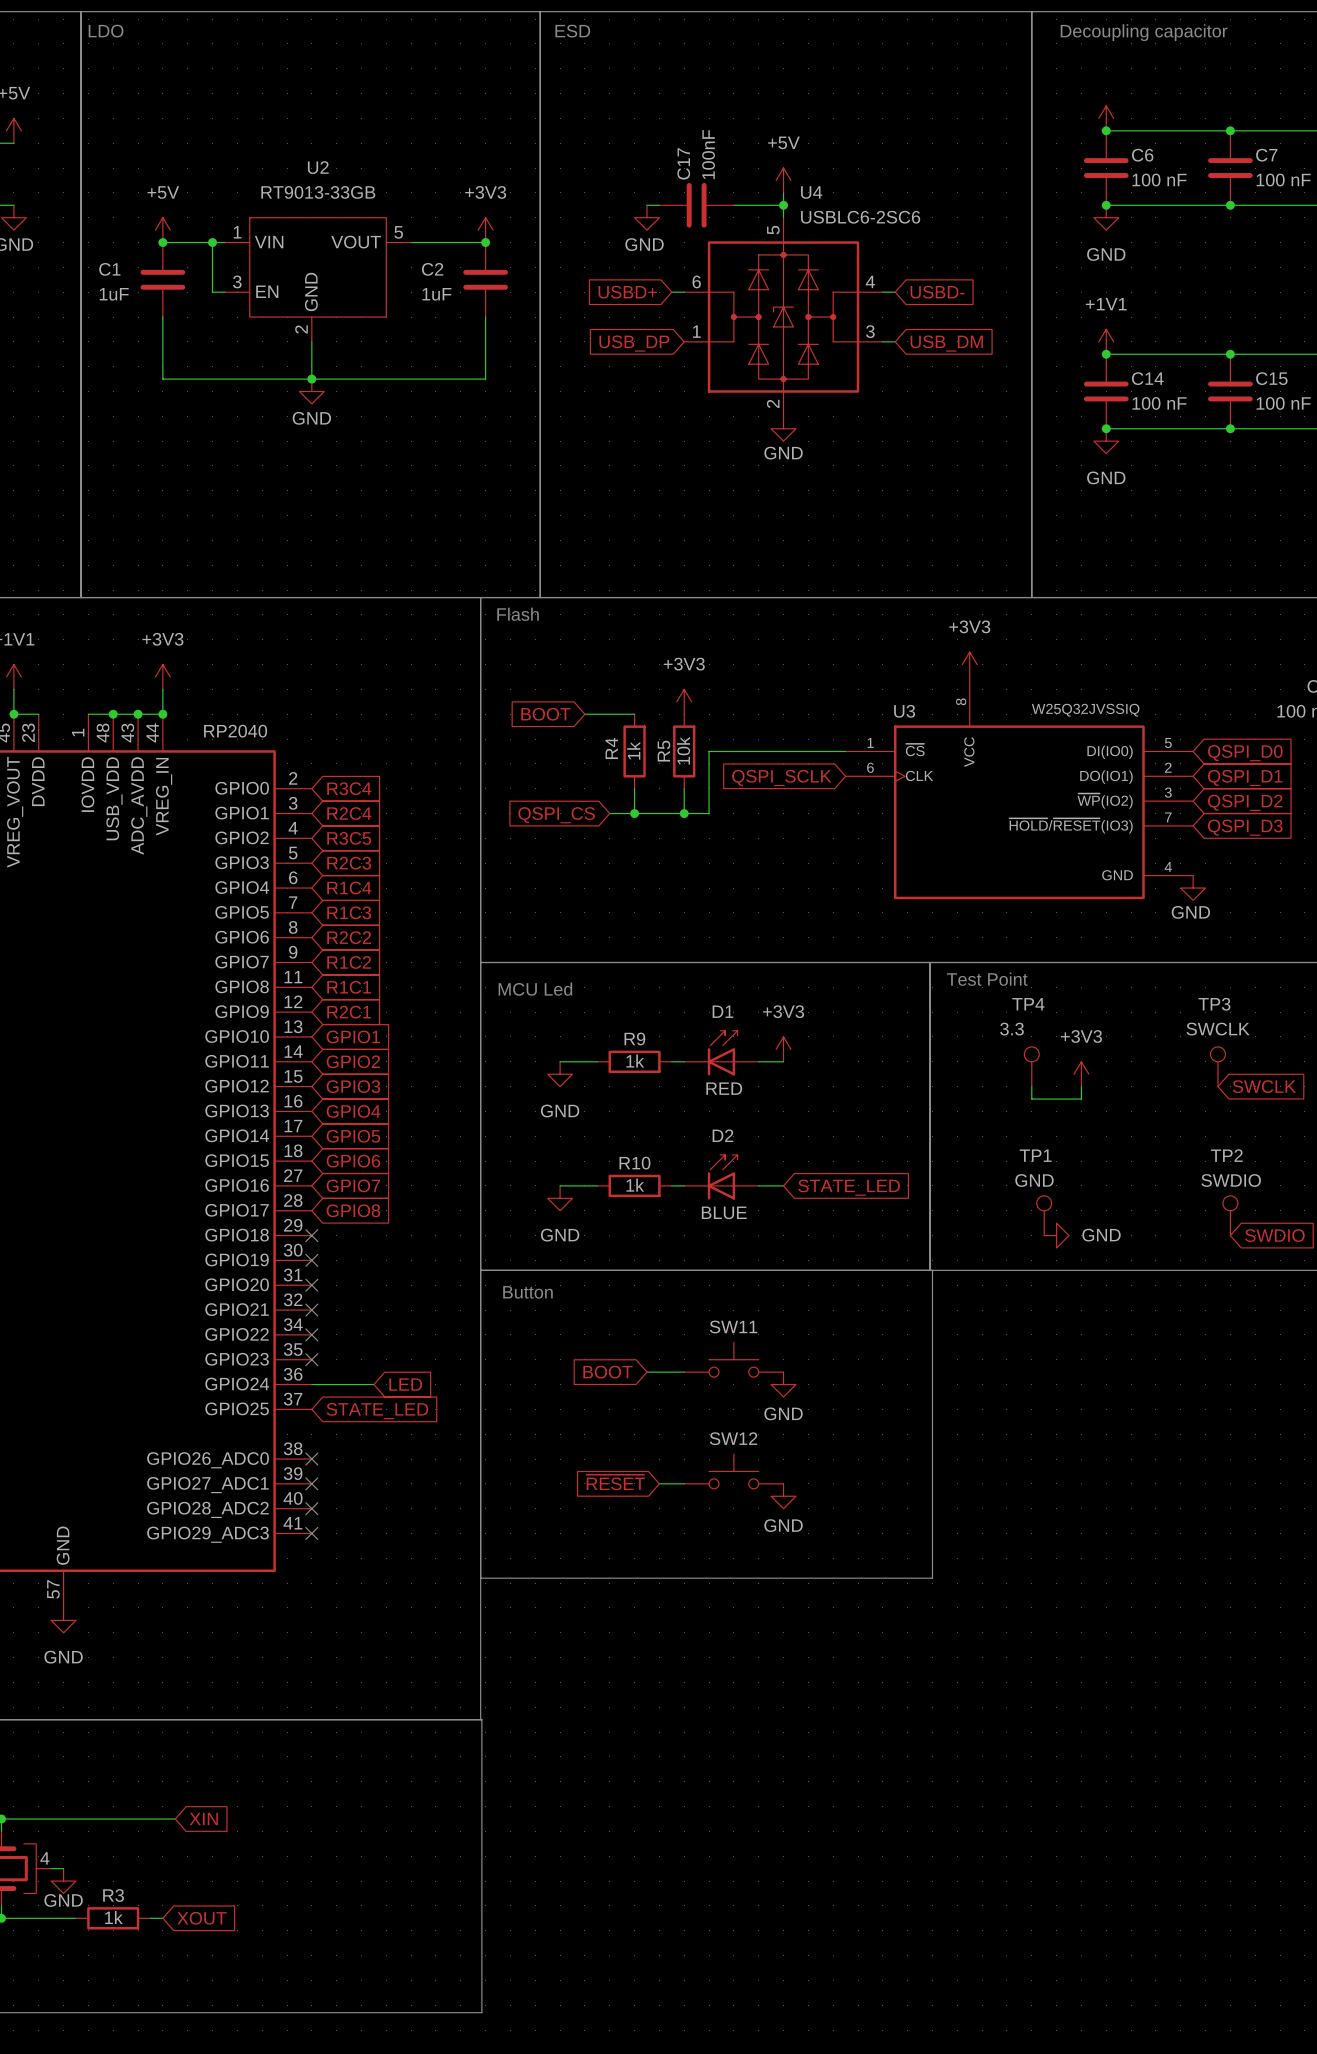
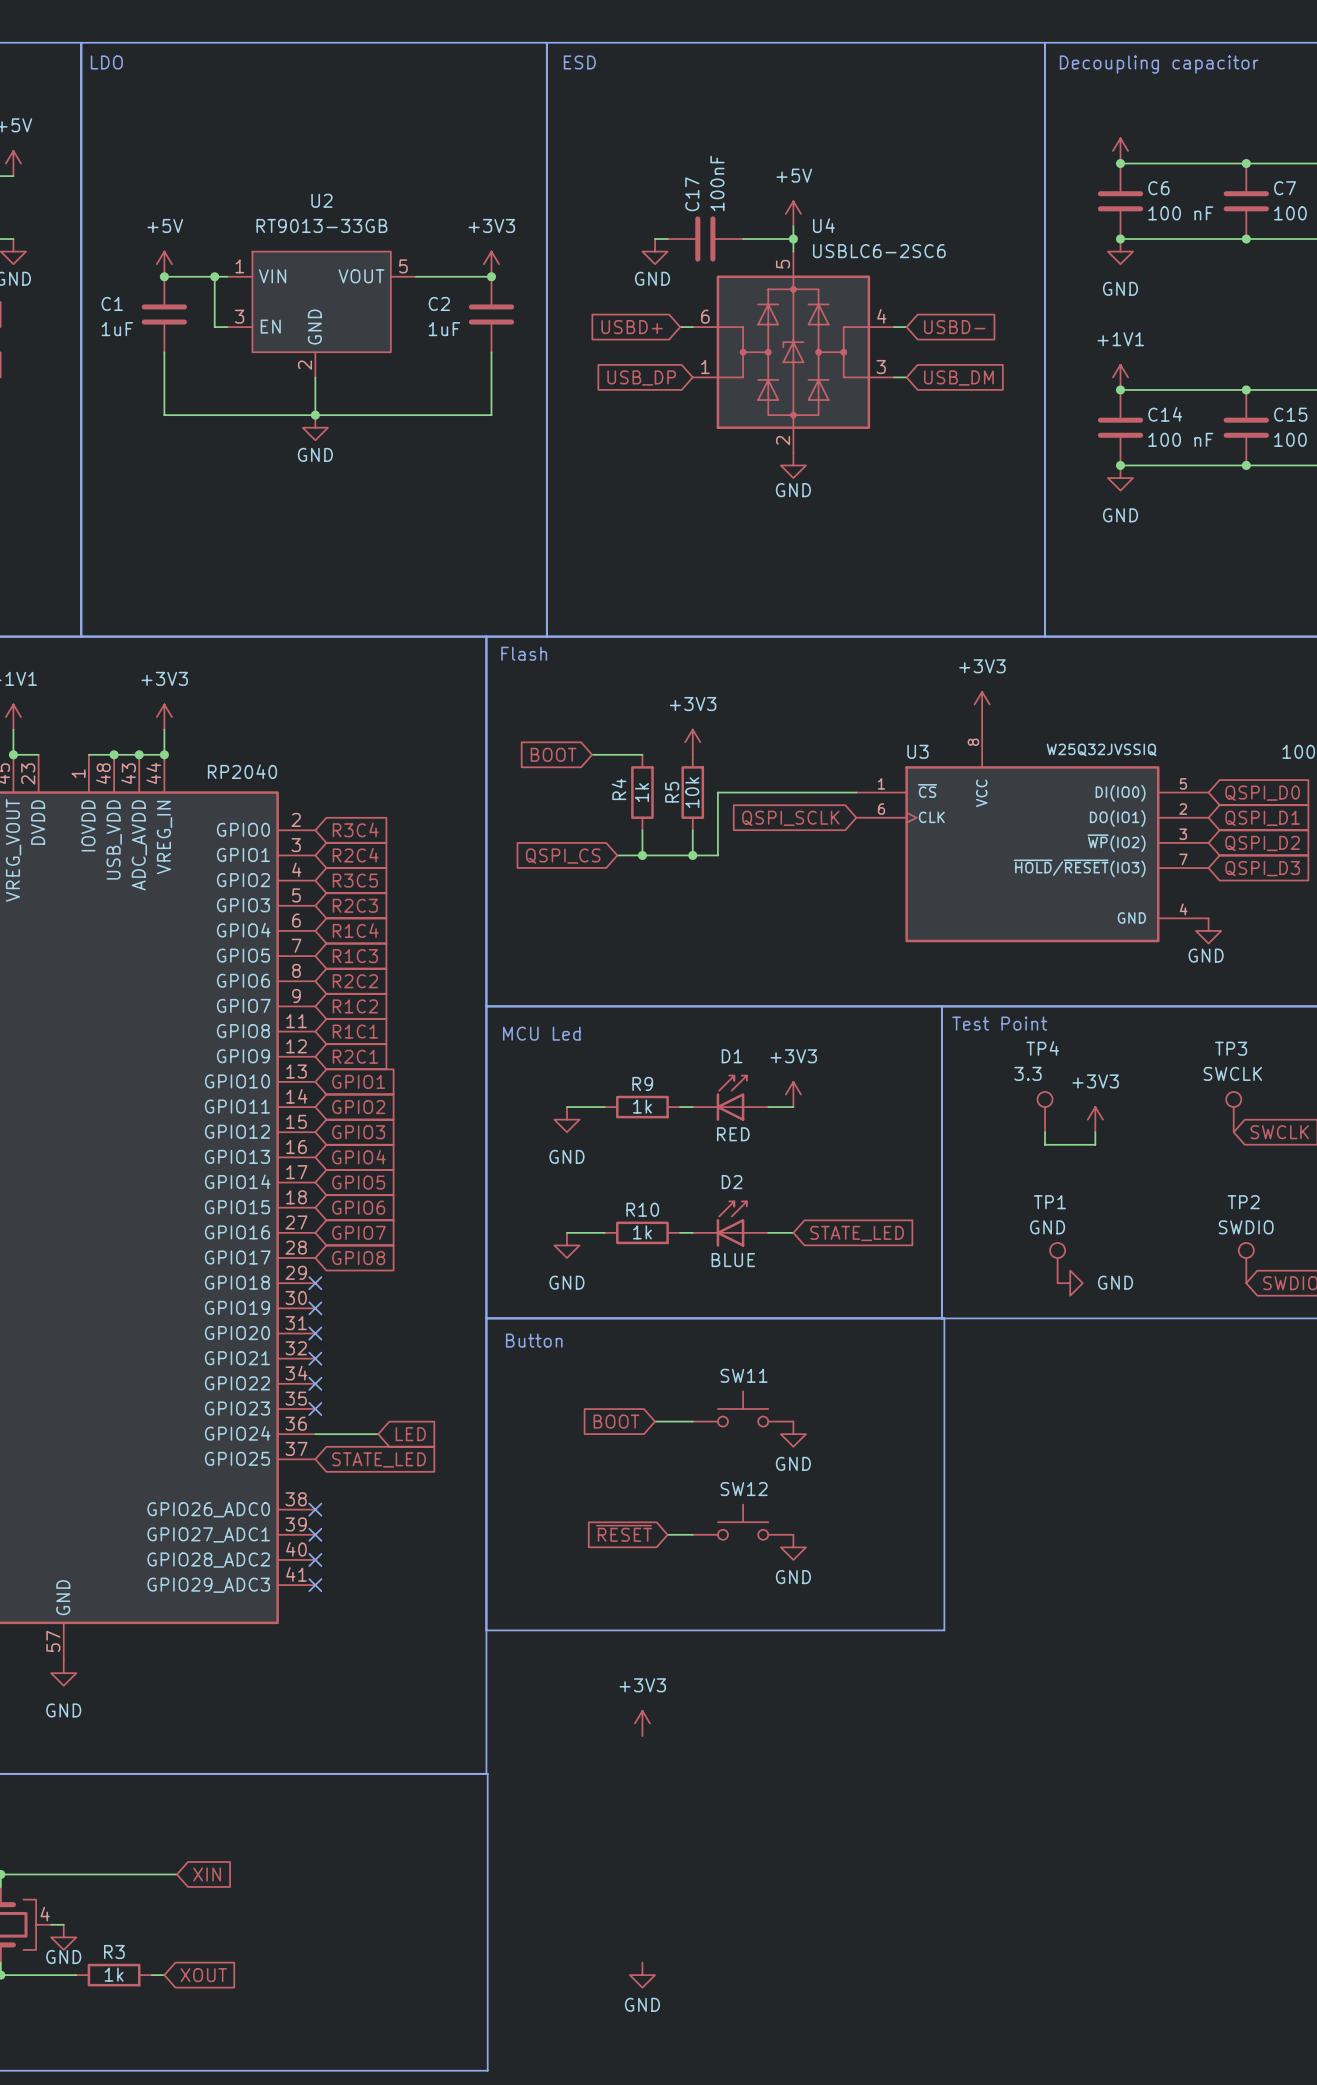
power symbol: none -> +3V3 (642, 1723)
power symbol: none -> GND (642, 1975)

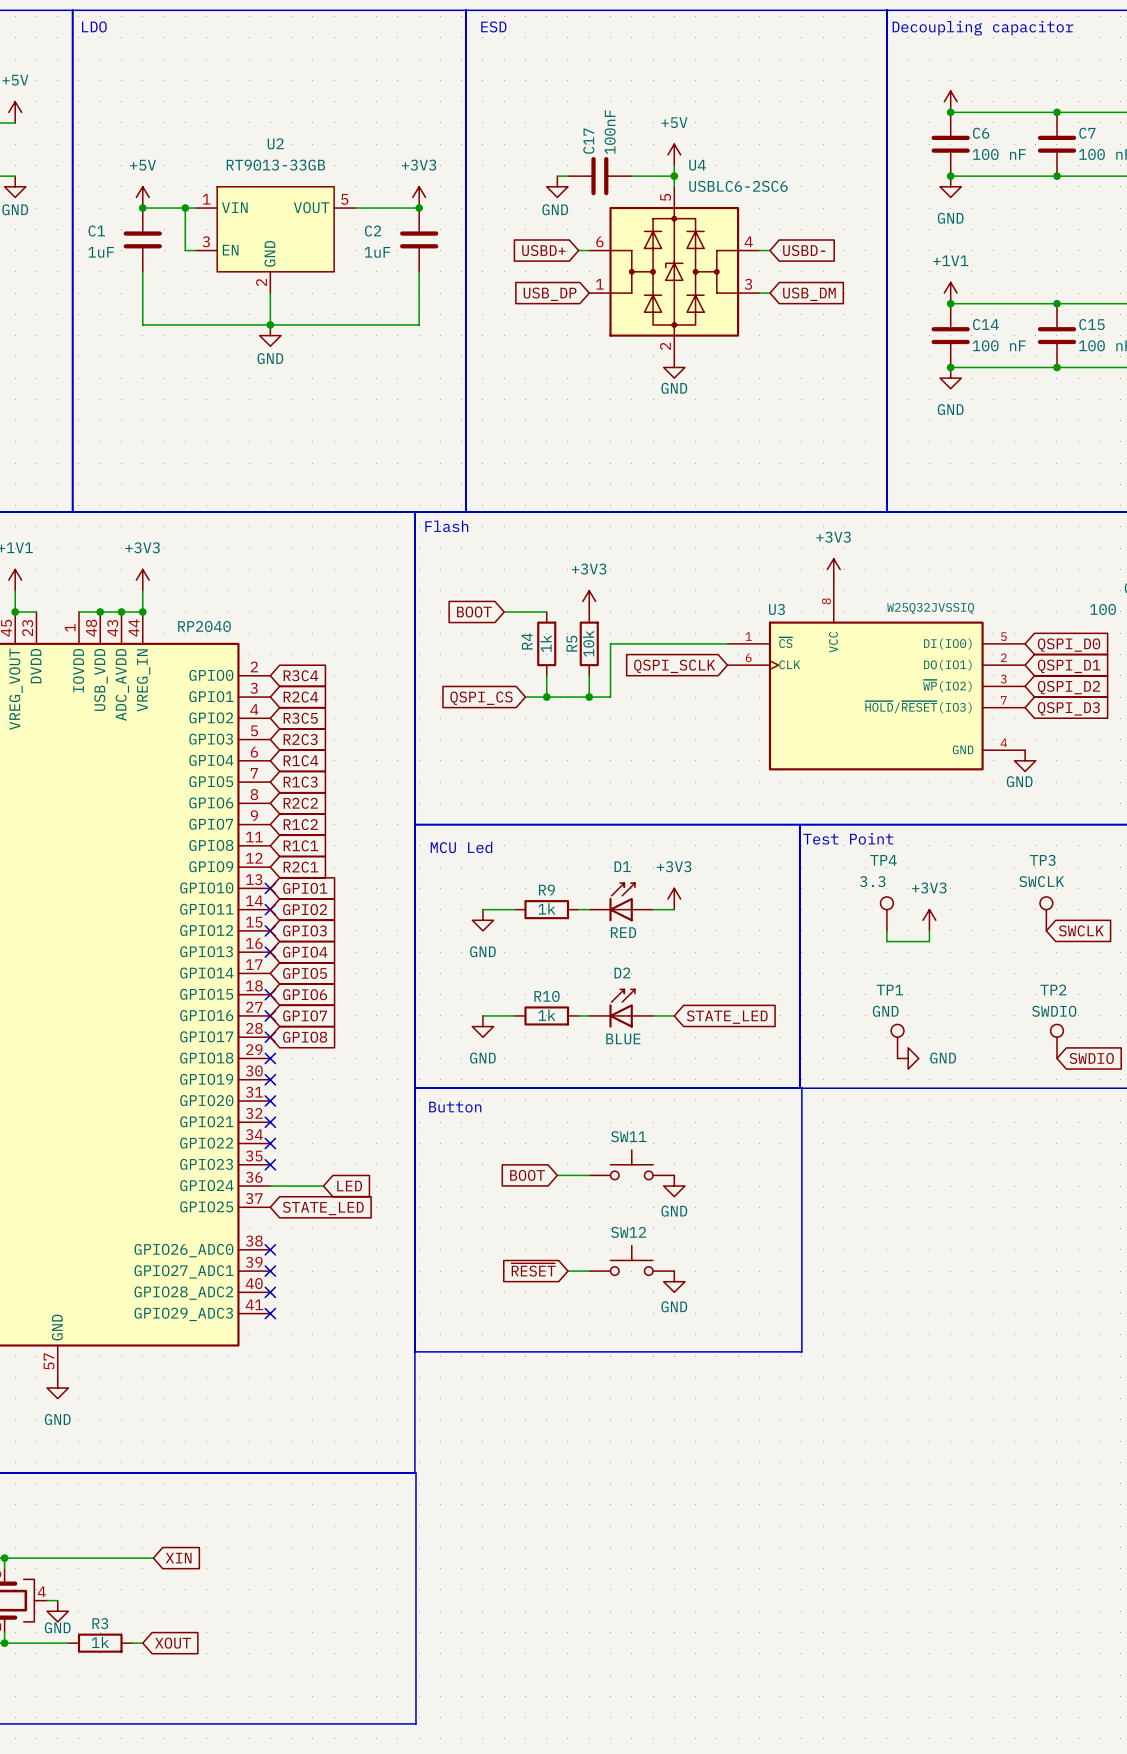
no-connect mark: none -> (270, 888)
no-connect mark: none -> (270, 909)
no-connect mark: none -> (270, 930)
no-connect mark: none -> (270, 952)
no-connect mark: none -> (270, 994)
no-connect mark: none -> (270, 1015)
no-connect mark: none -> (270, 1037)
power symbol: +3V3 (642, 1723) -> none
power symbol: GND (642, 1975) -> none

